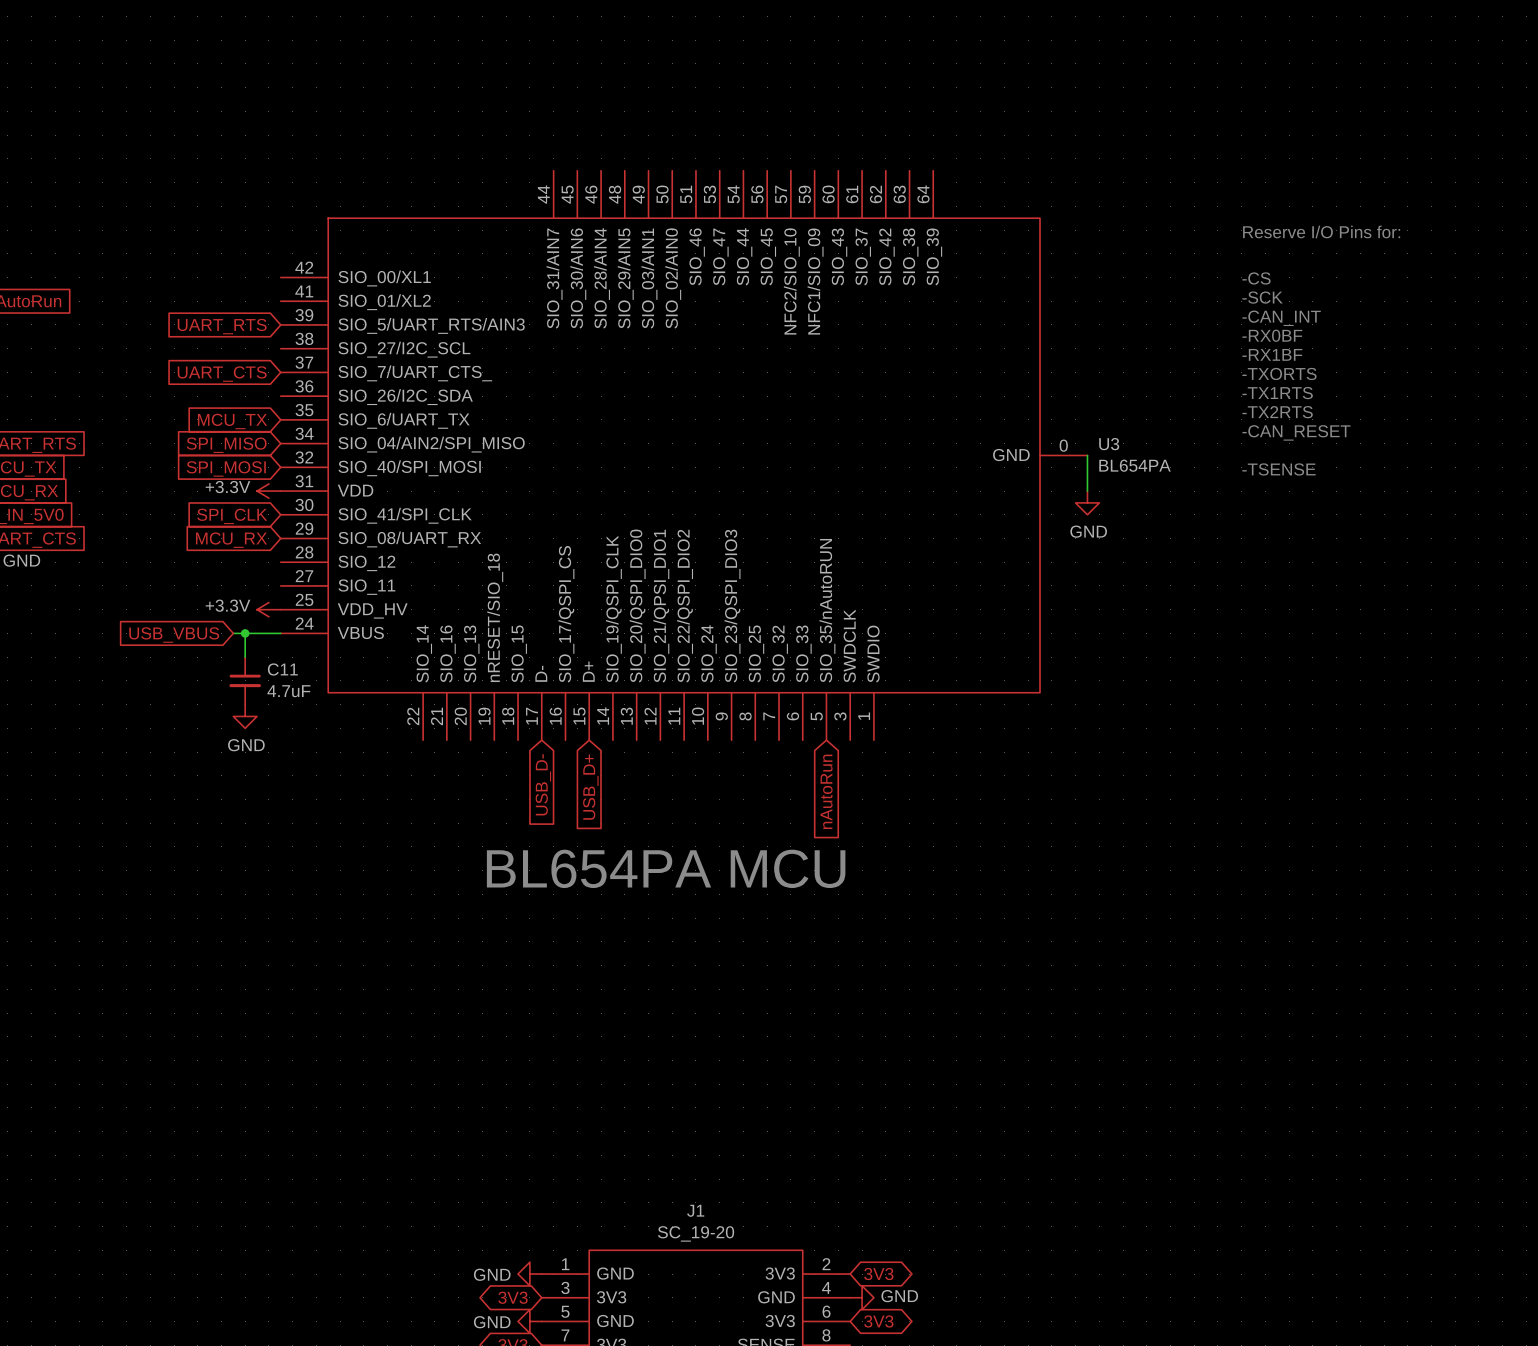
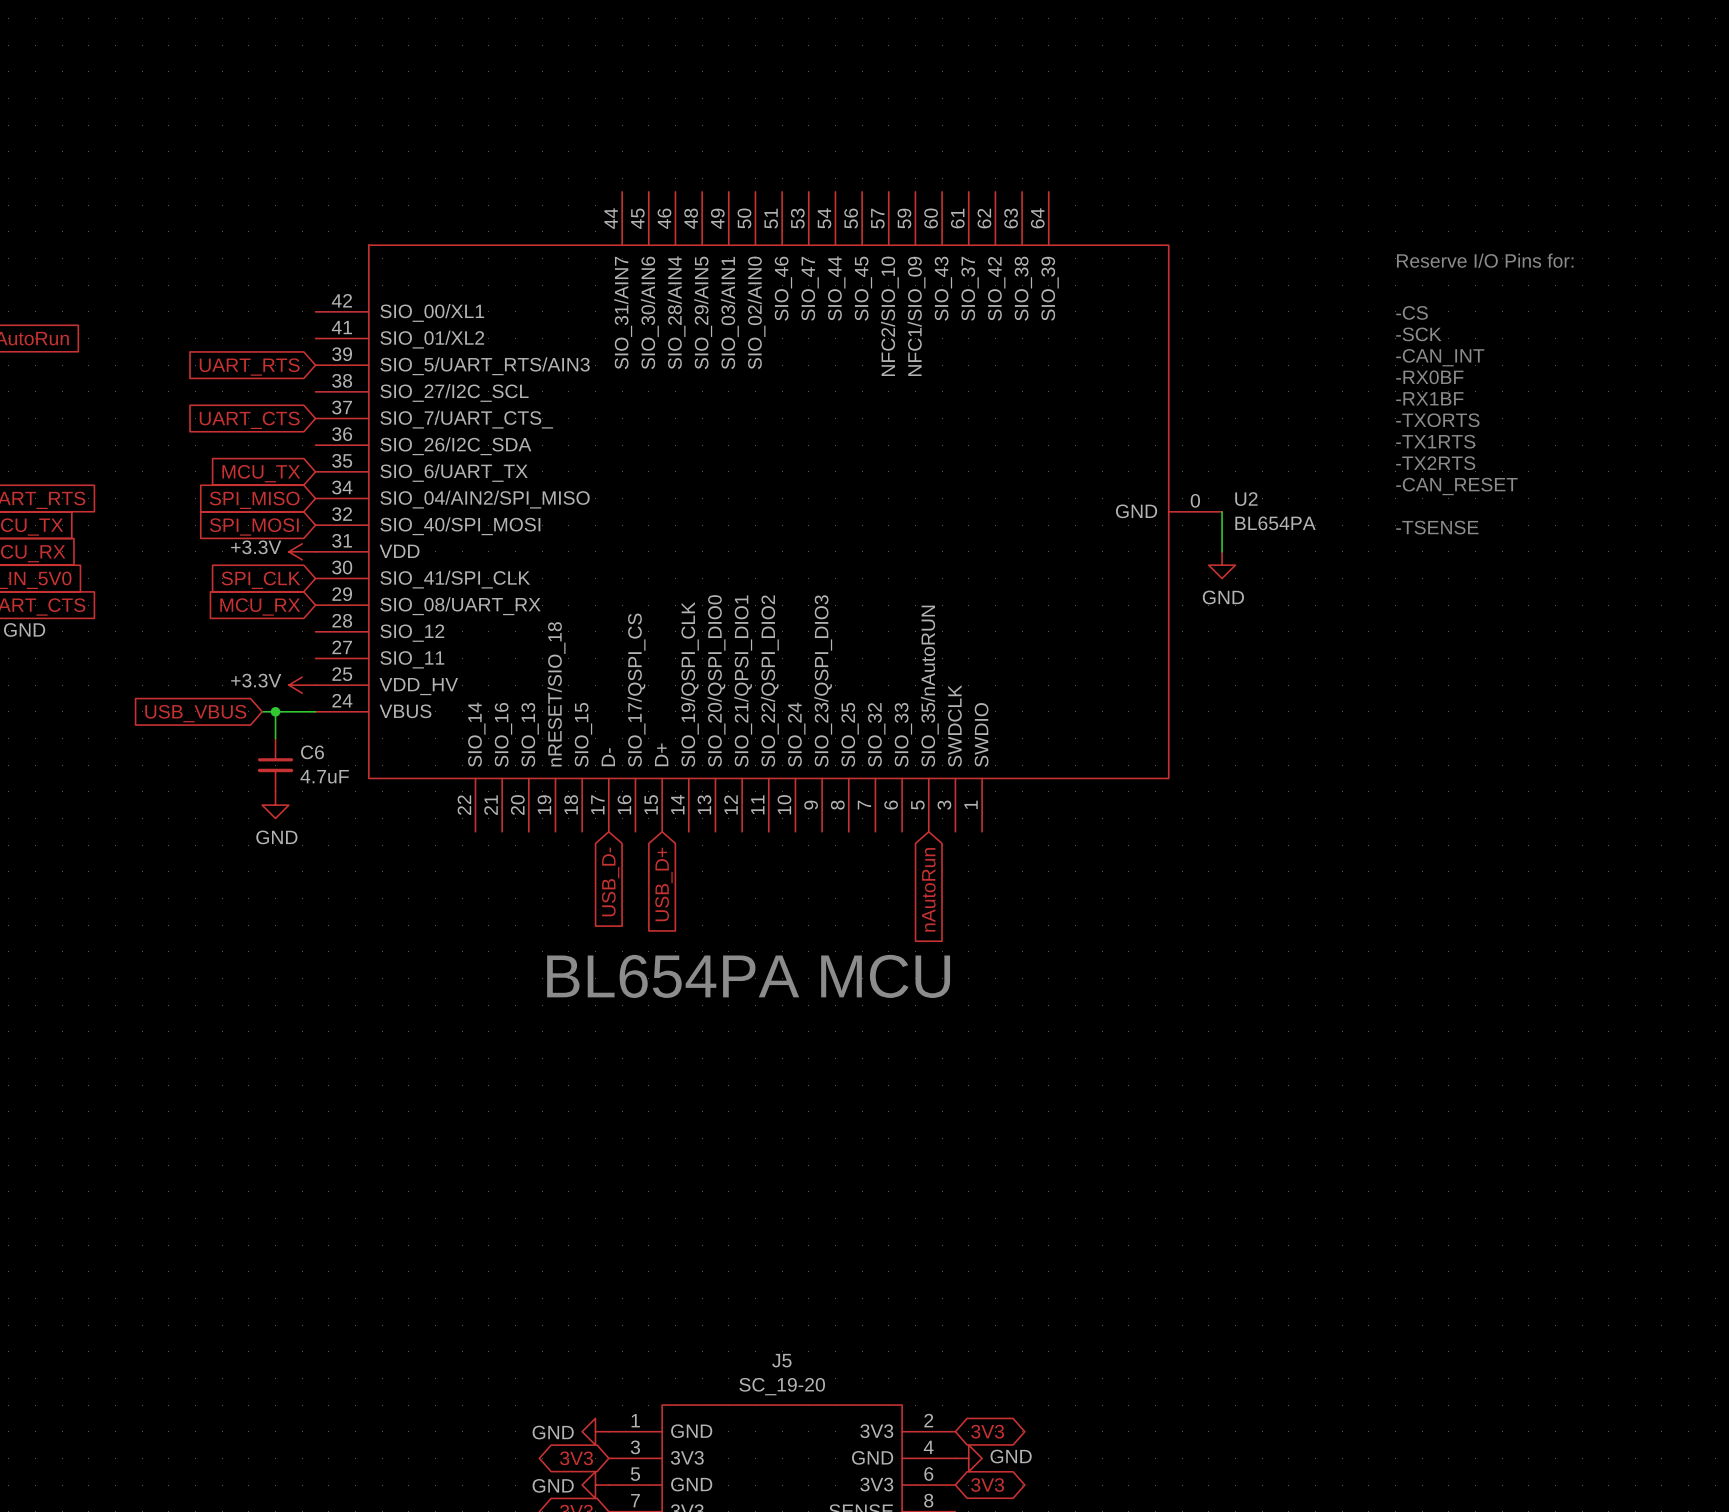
U3 name: U3 (1109, 444) -> U2 (1246, 499)
C11 name: C11 (282, 669) -> C6 (312, 752)
J1 name: J1 (695, 1210) -> J5 (781, 1360)

